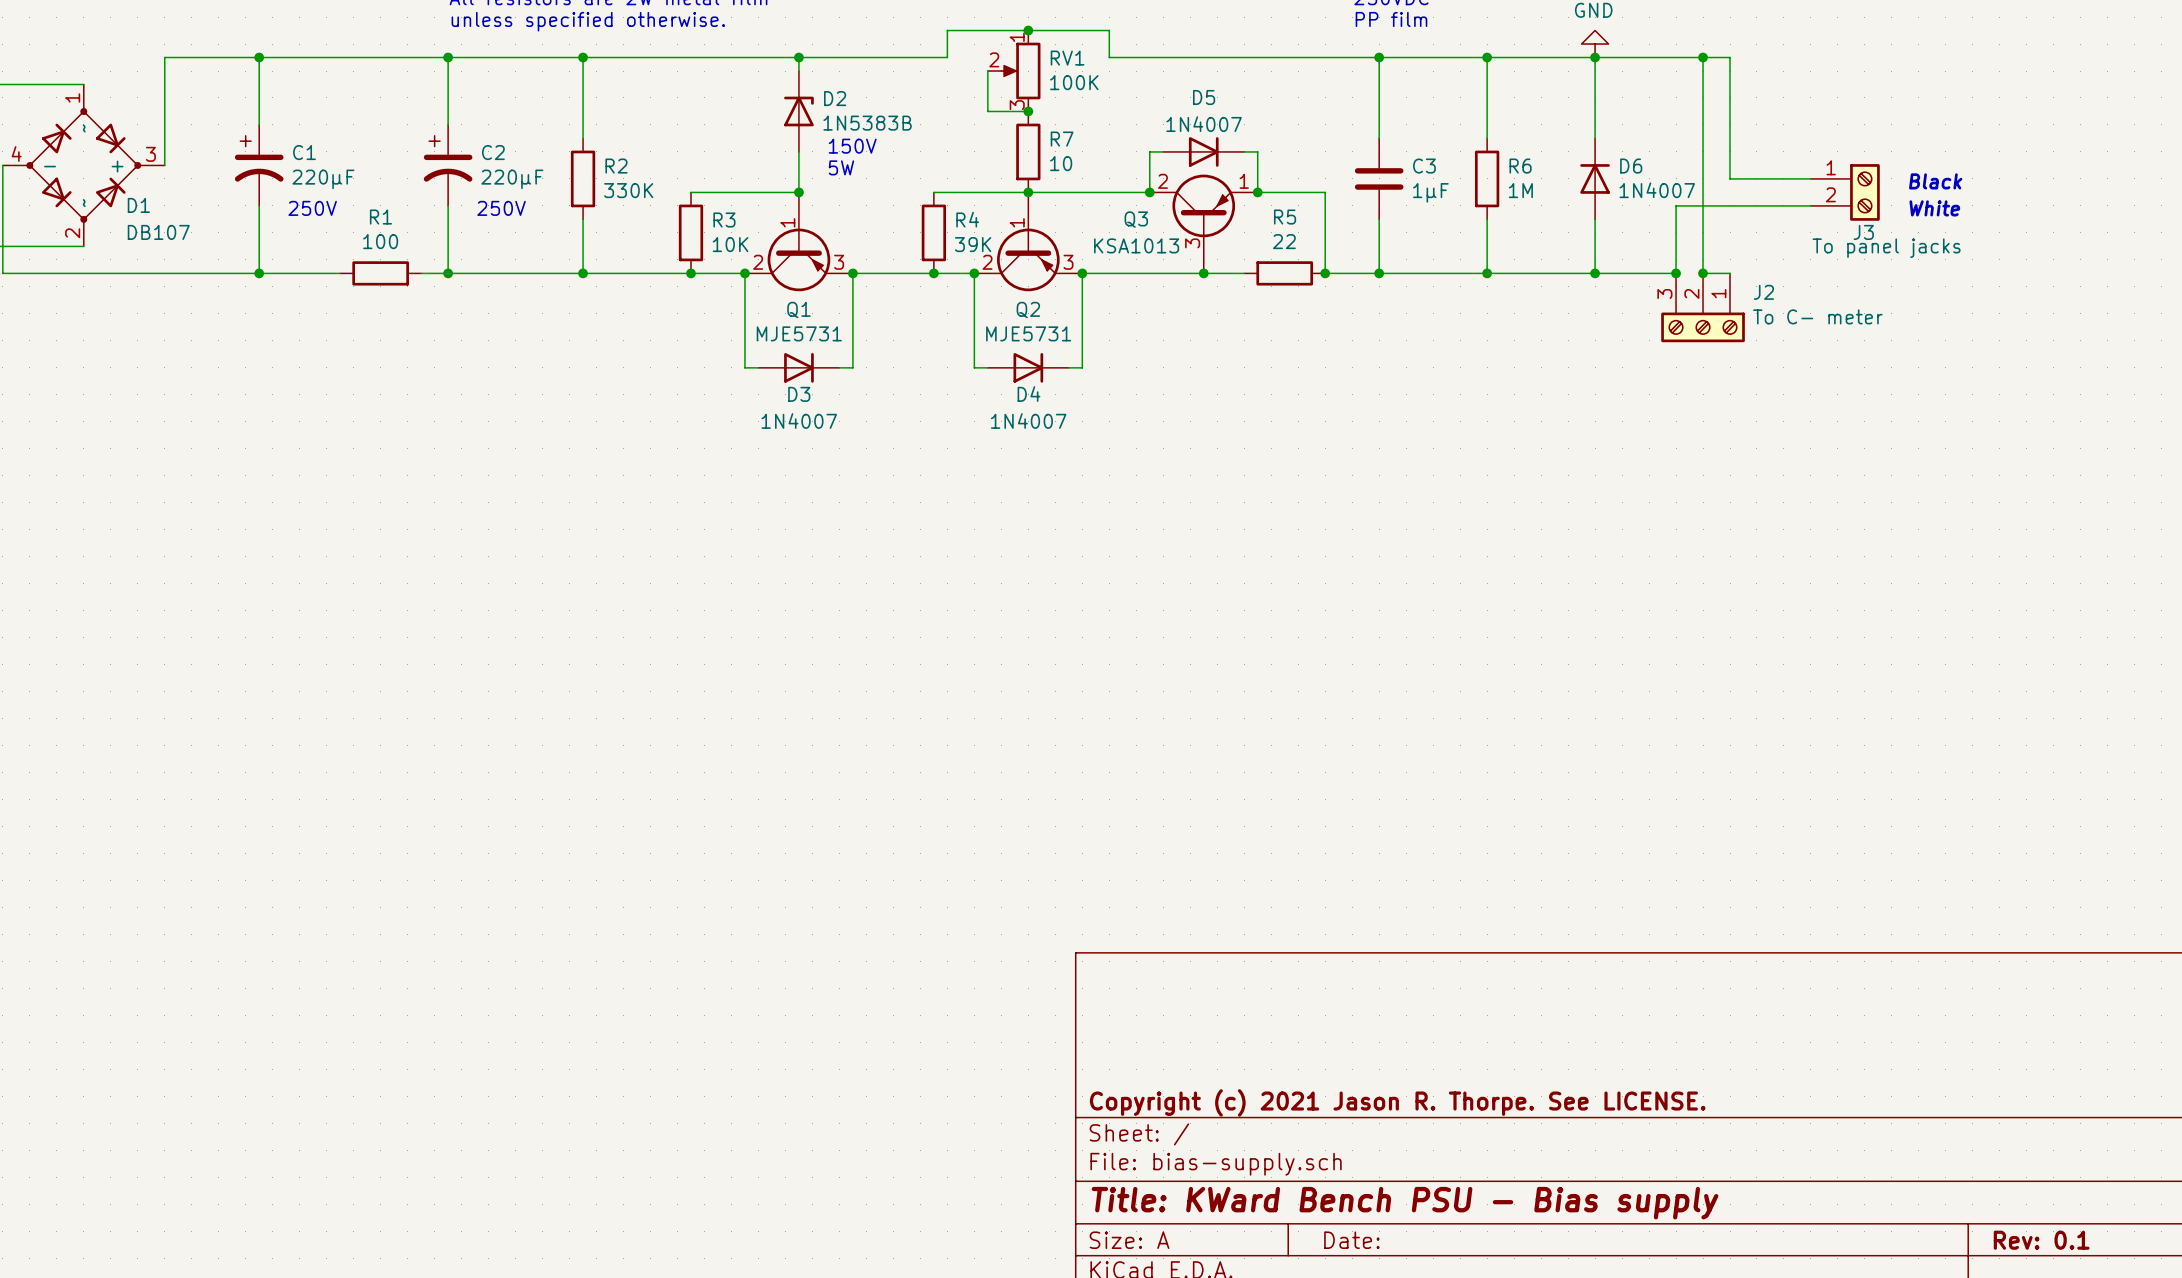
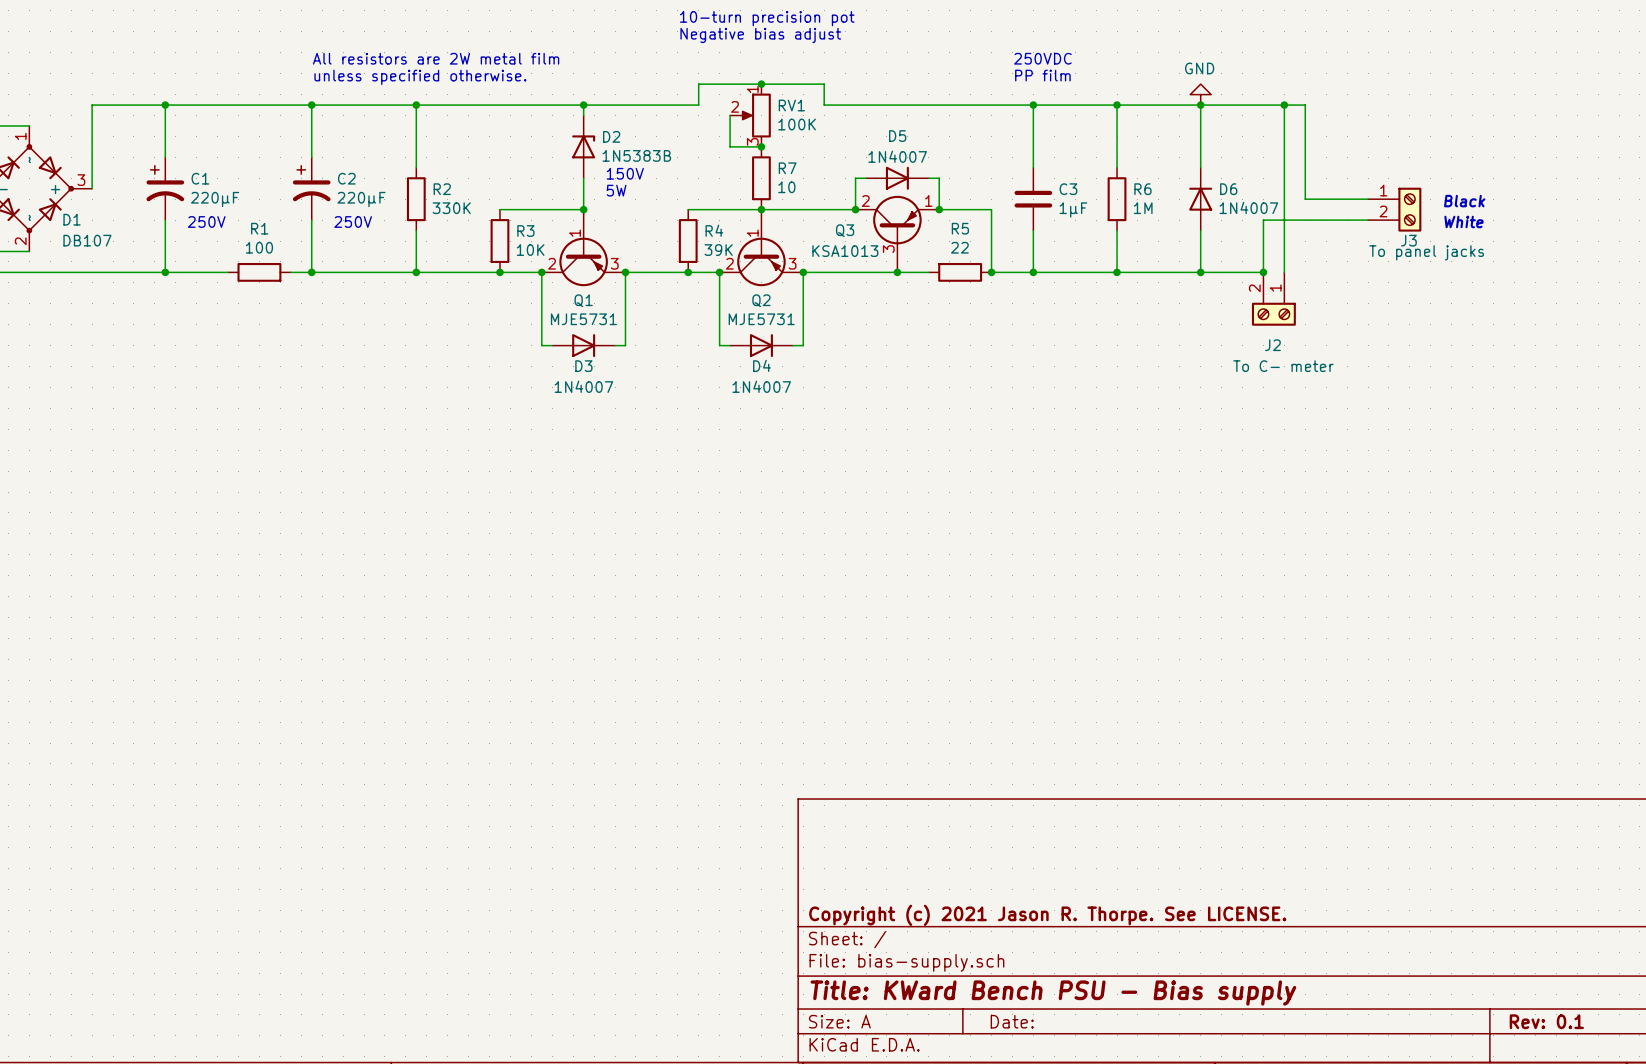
J2 symbol: [1661, 273, 1745, 343] -> [1251, 272, 1296, 326]
wire: (1703, 273) (1730, 273) -> none
junction: (1703, 273) -> none
J2 name position: J2 (1763, 292) -> J2 (1272, 345)
J2 value position: To C- meter (1817, 316) -> To C- meter (1283, 366)

